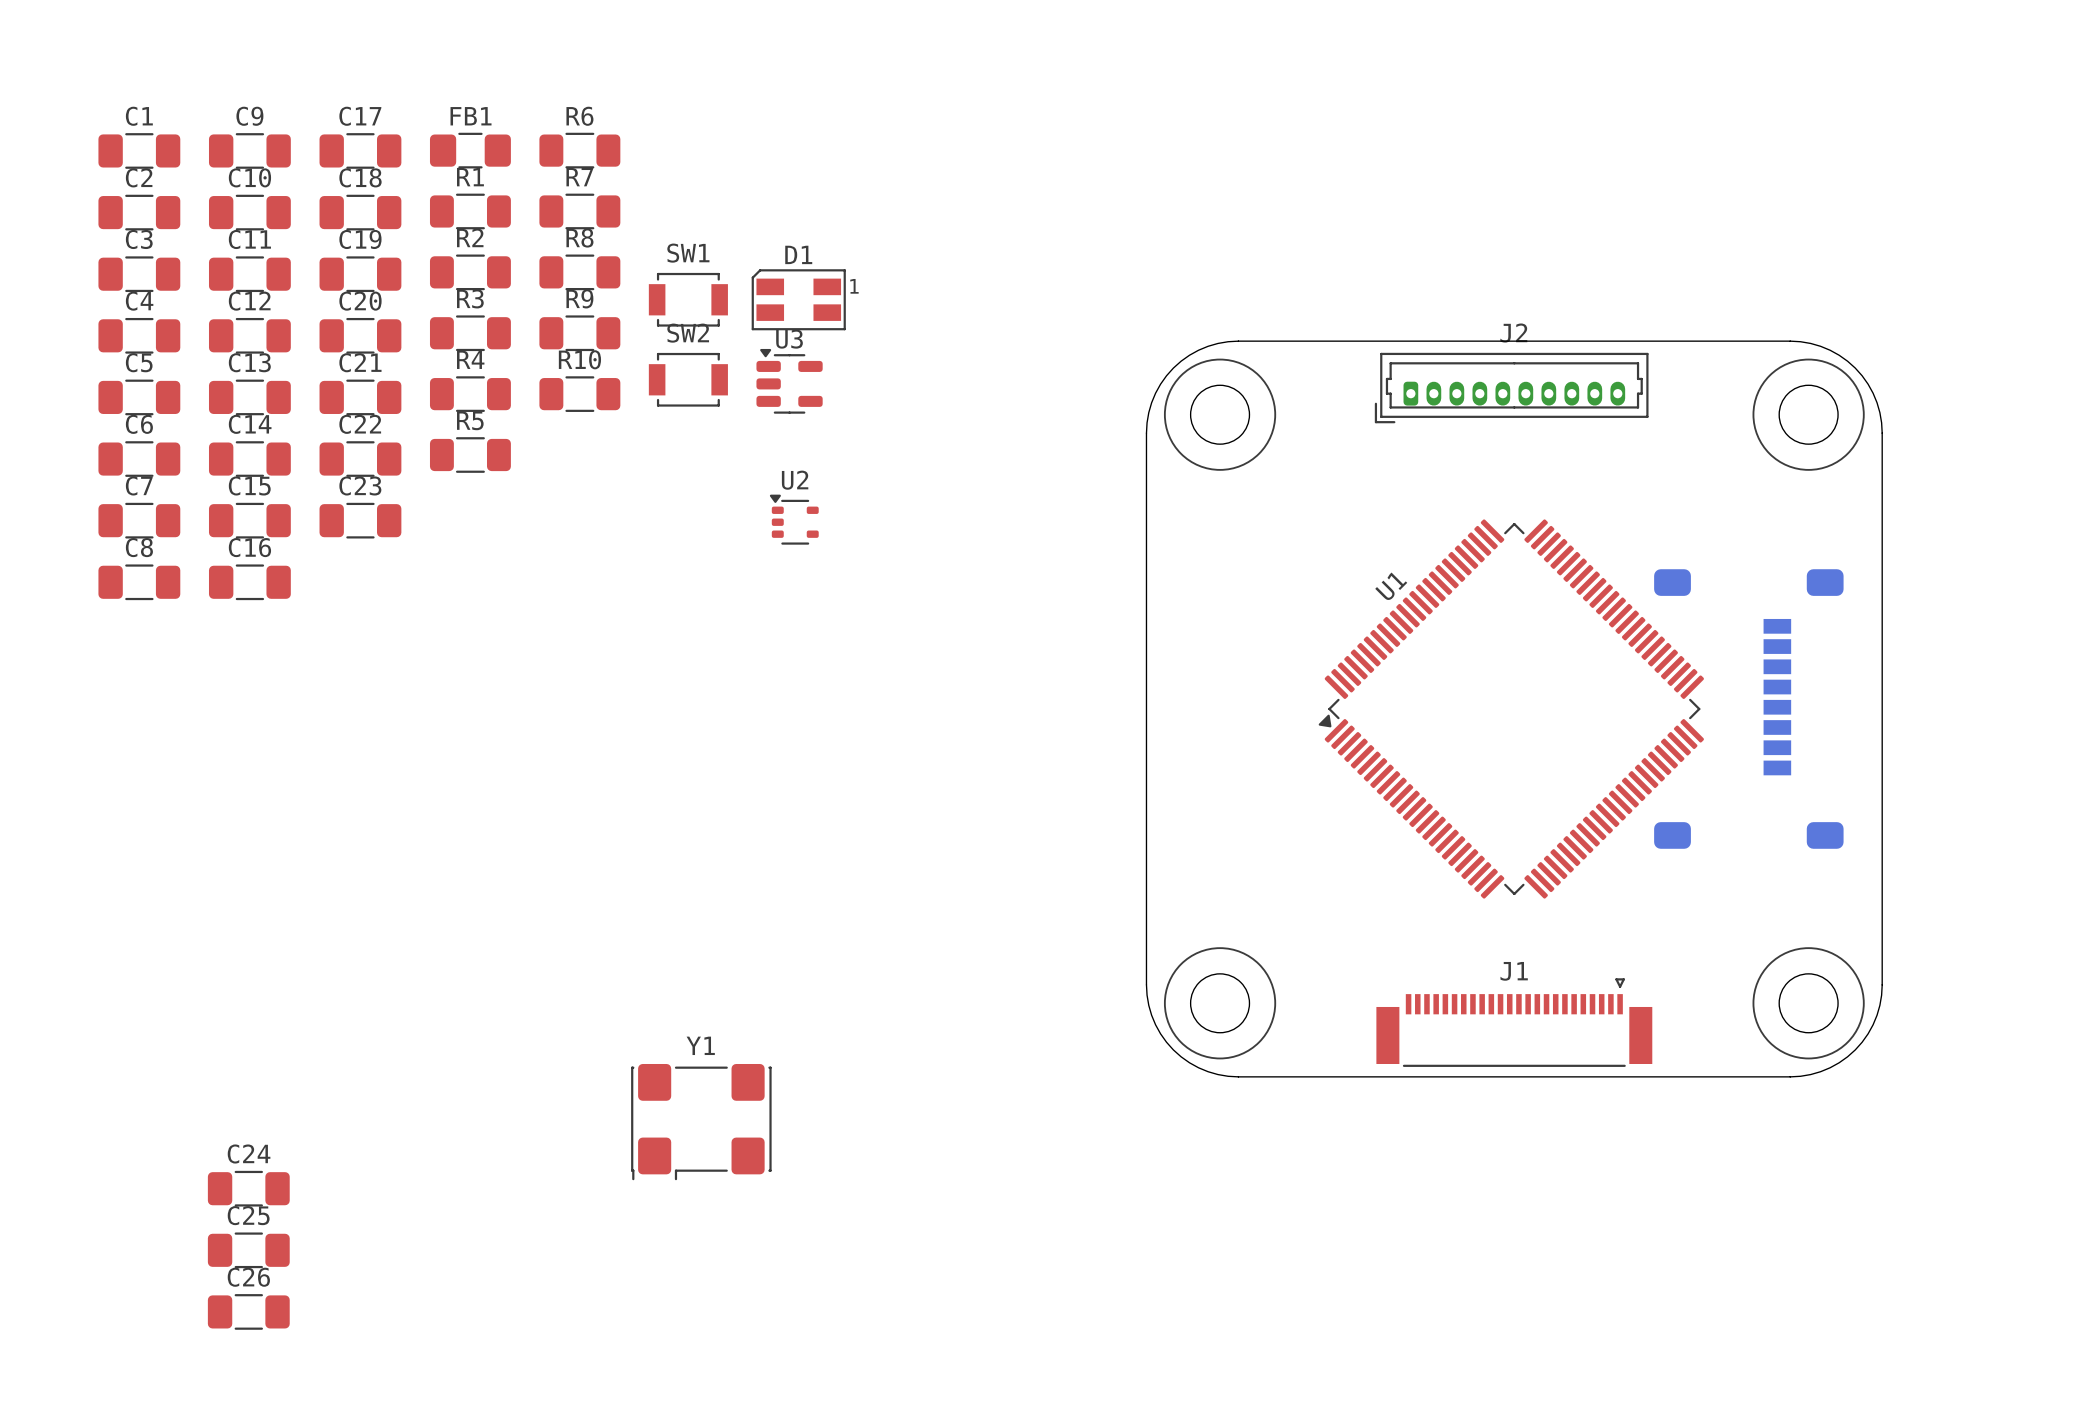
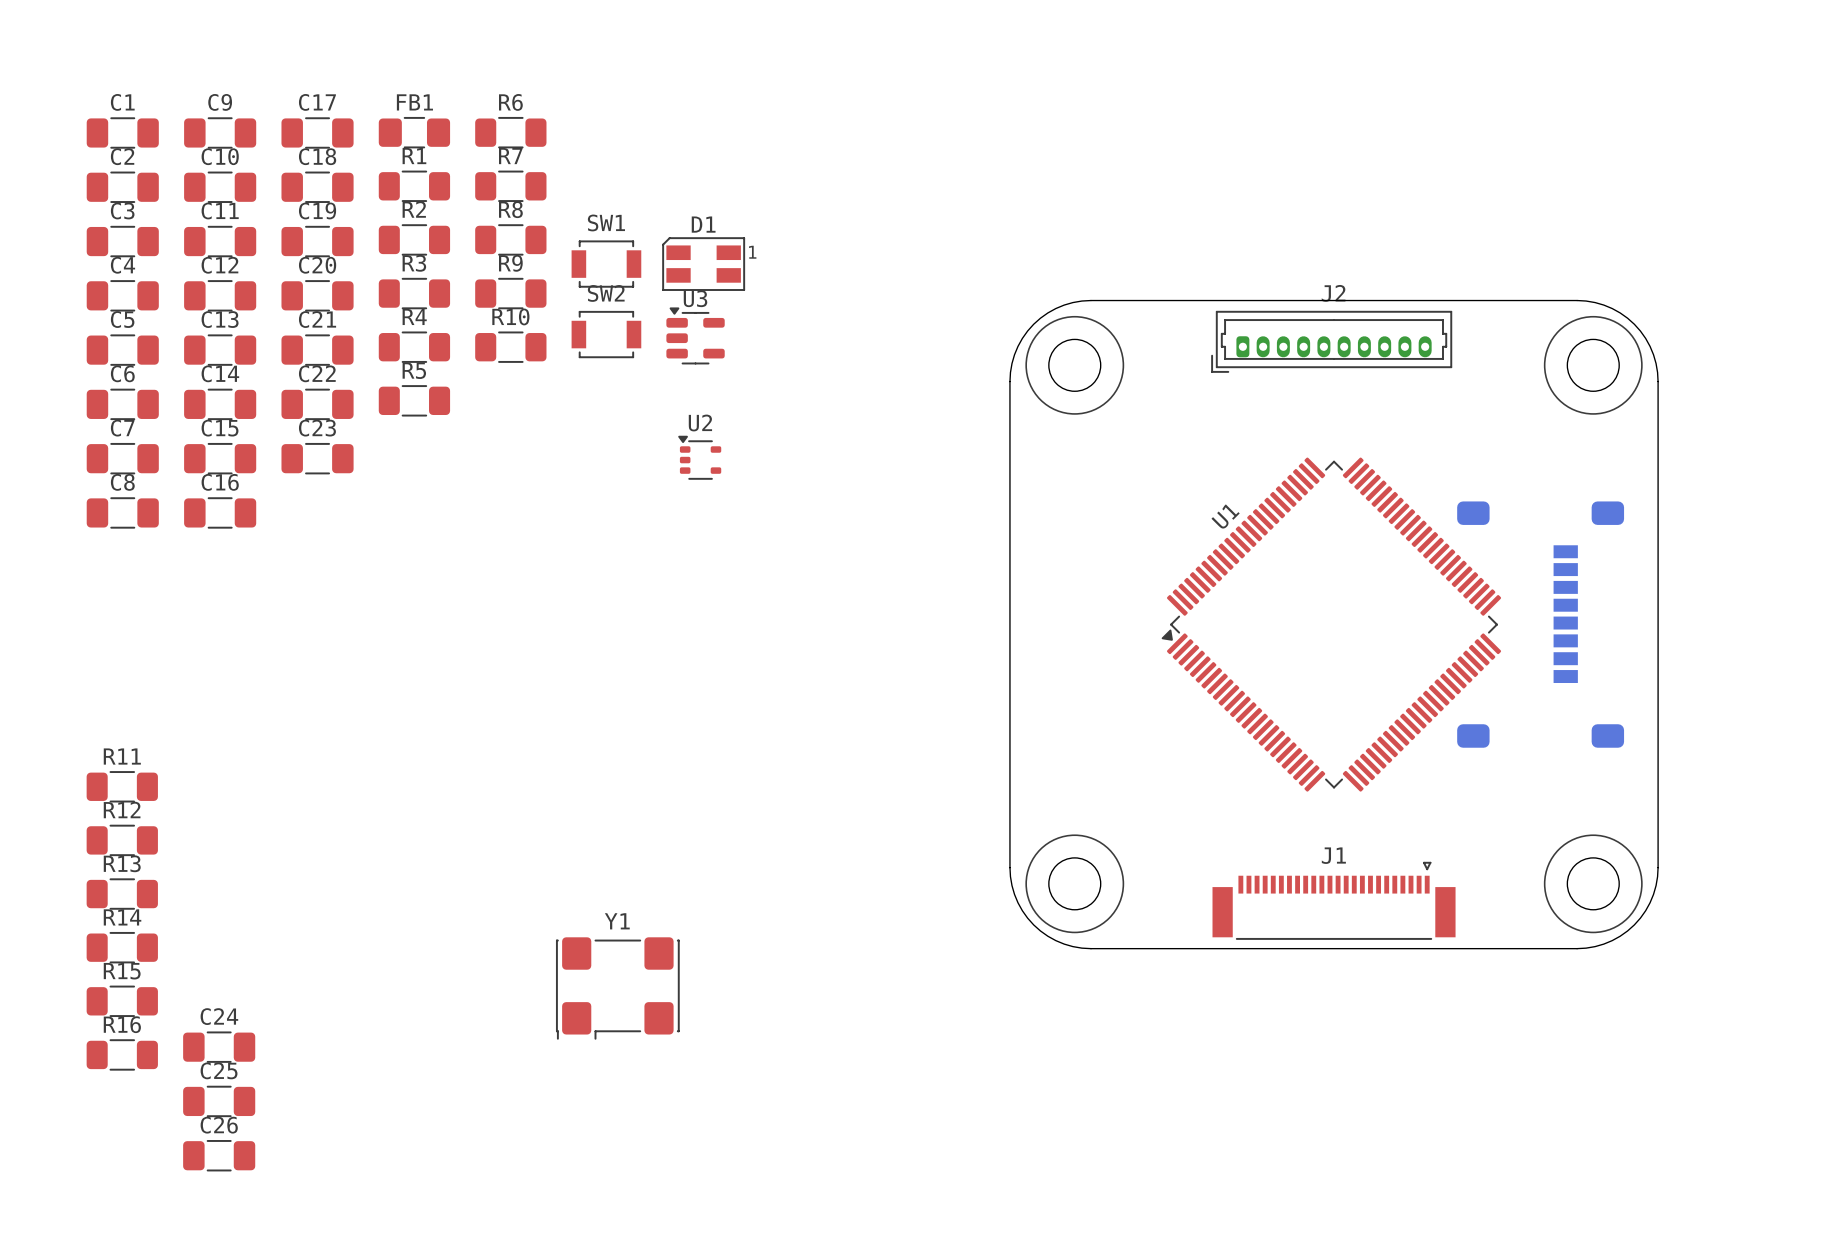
R11: none -> (122, 786)
R12: none -> (122, 840)
R13: none -> (122, 894)
R14: none -> (122, 947)
R15: none -> (122, 1001)
R16: none -> (122, 1054)

